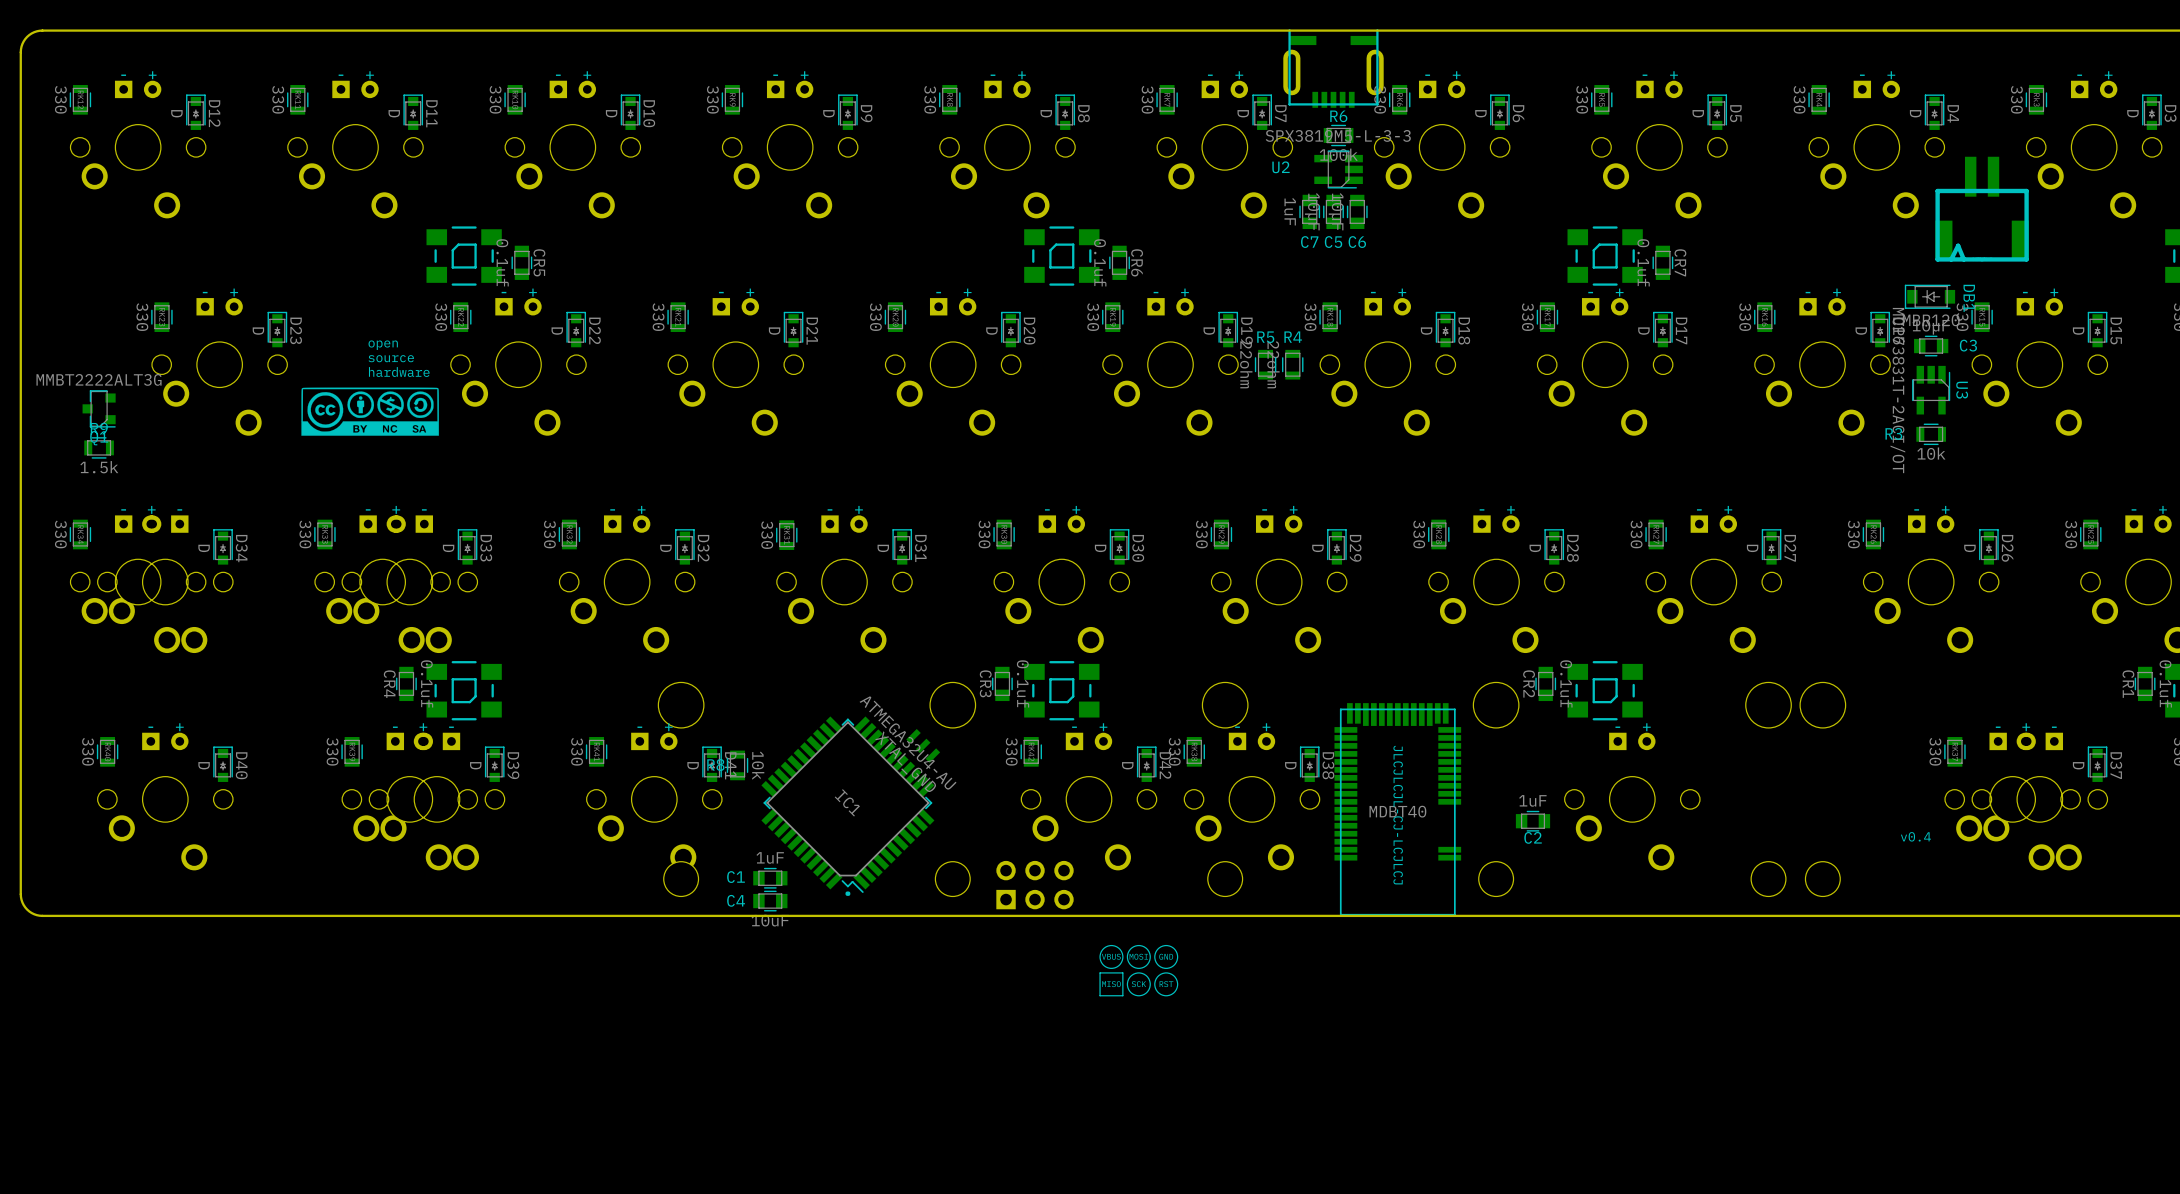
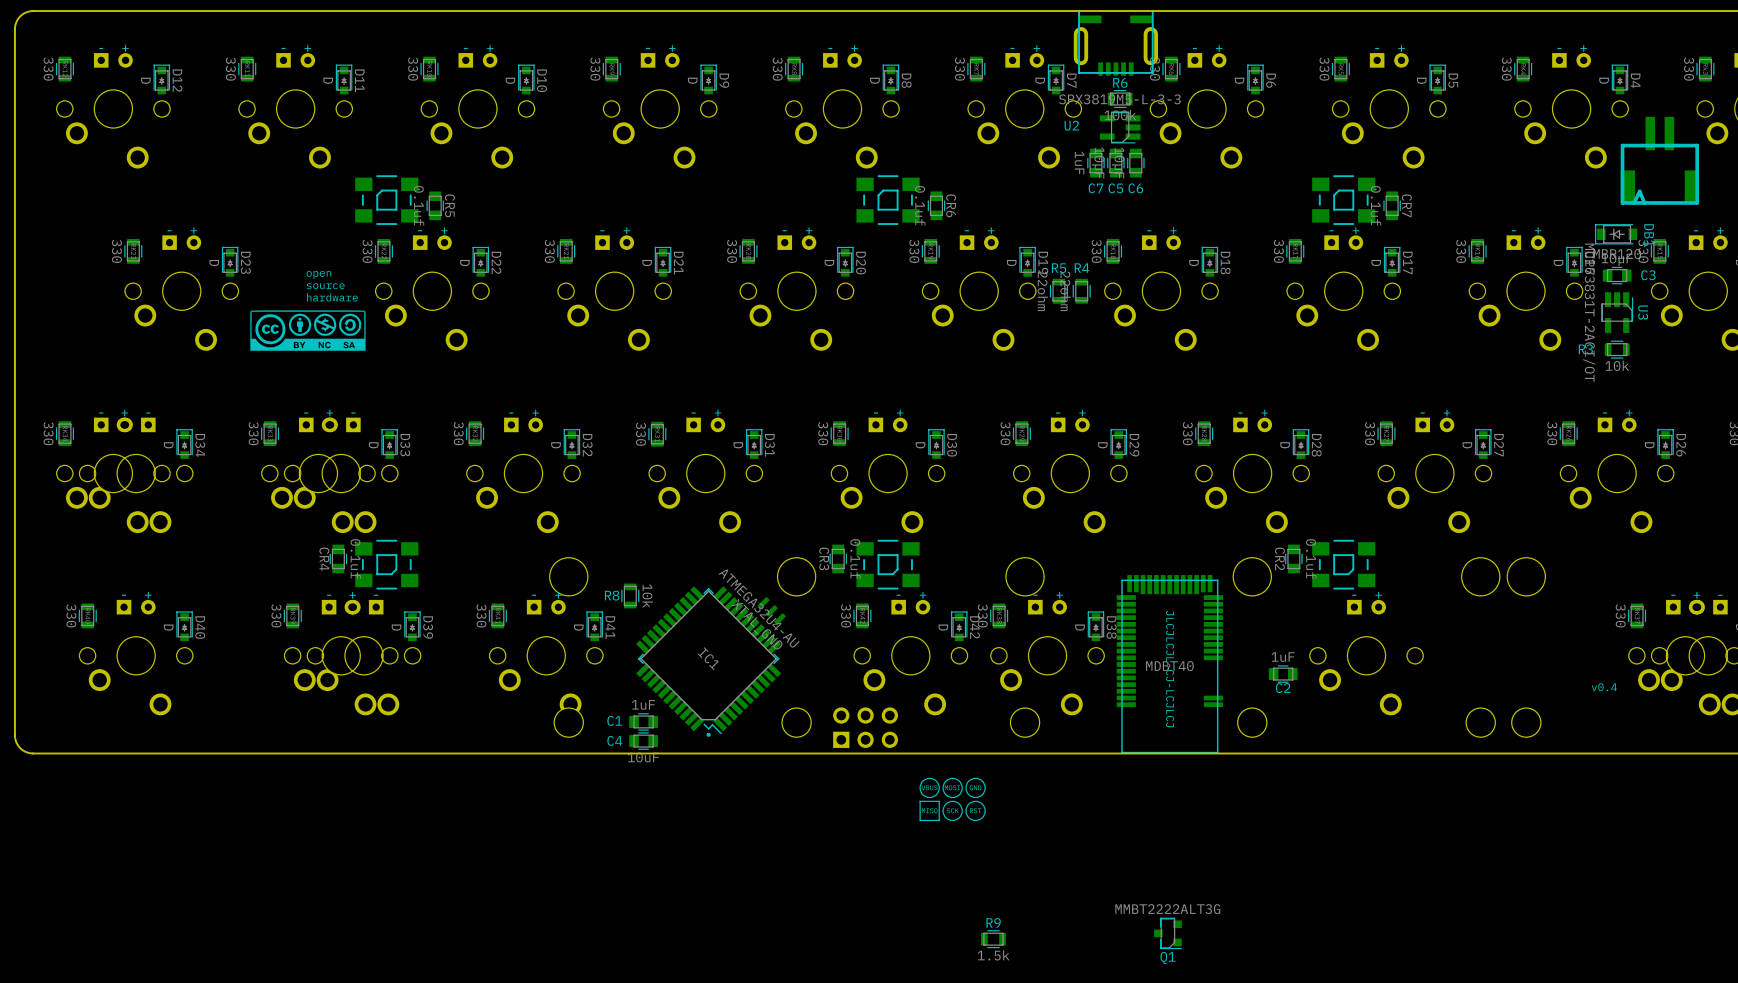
Q1 position: (99, 408) -> (1167, 933)
R9 position: (99, 447) -> (993, 939)
R8 position: (737, 765) -> (630, 595)

